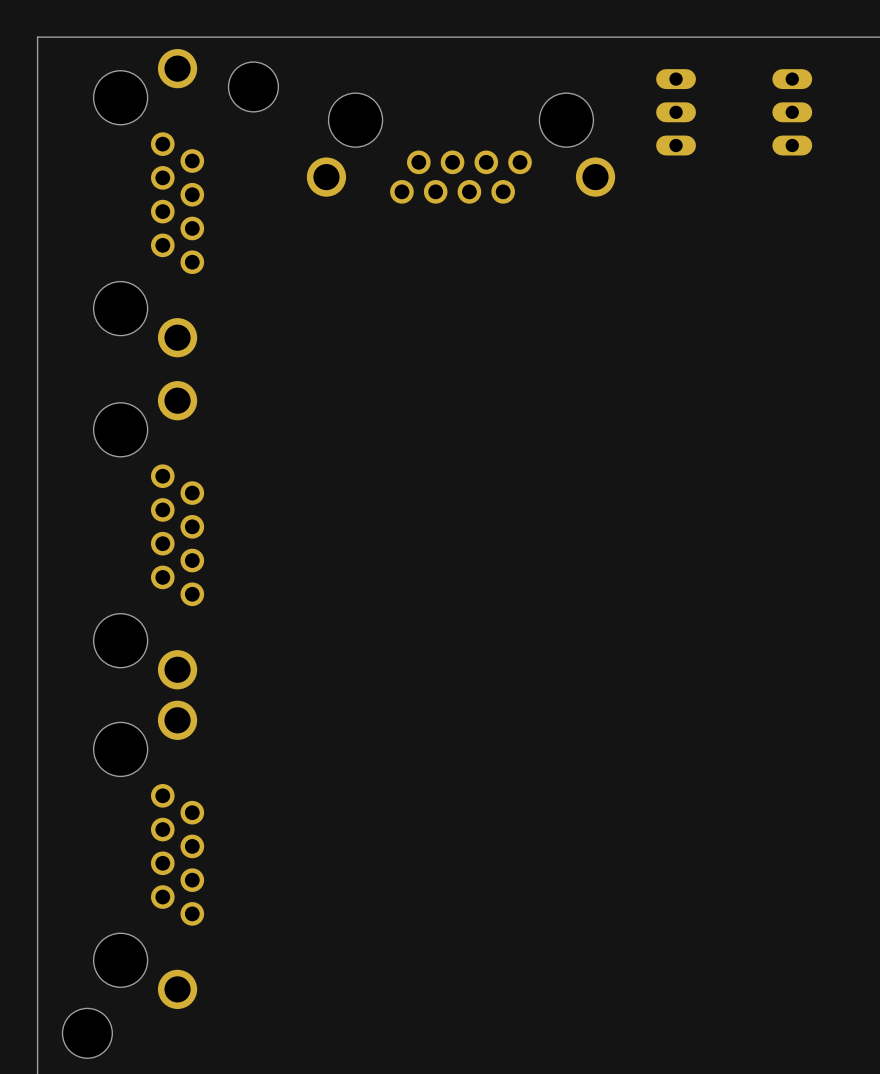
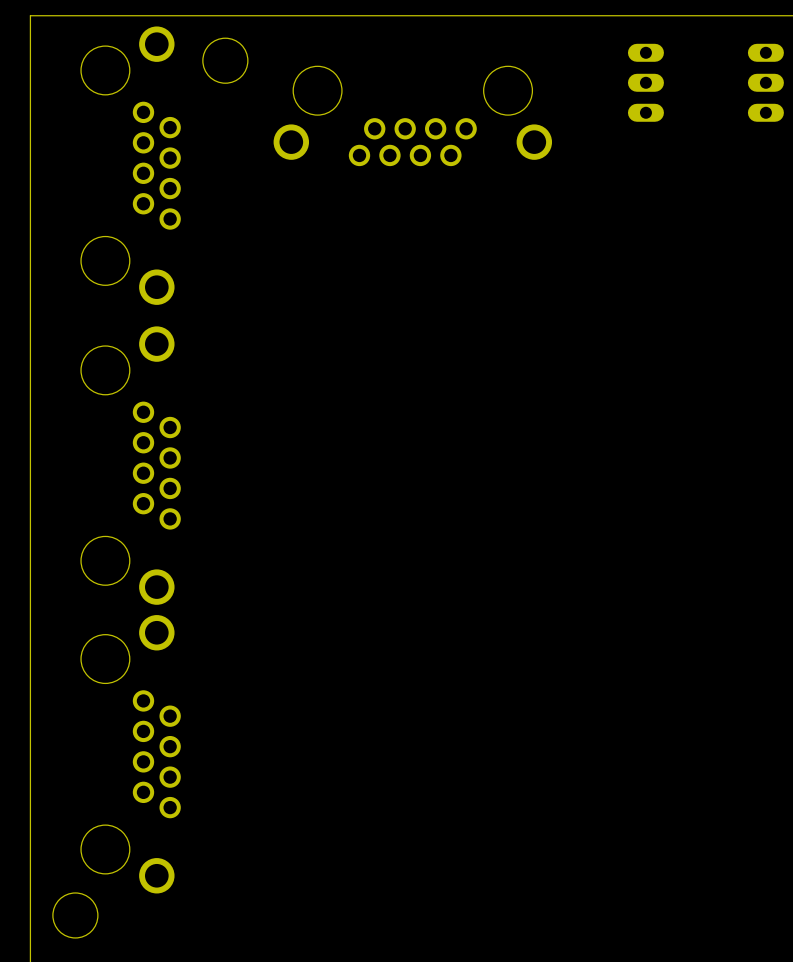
part: none -> (645, 82)
part: none -> (765, 82)
part: (676, 112) -> none
part: (792, 112) -> none

